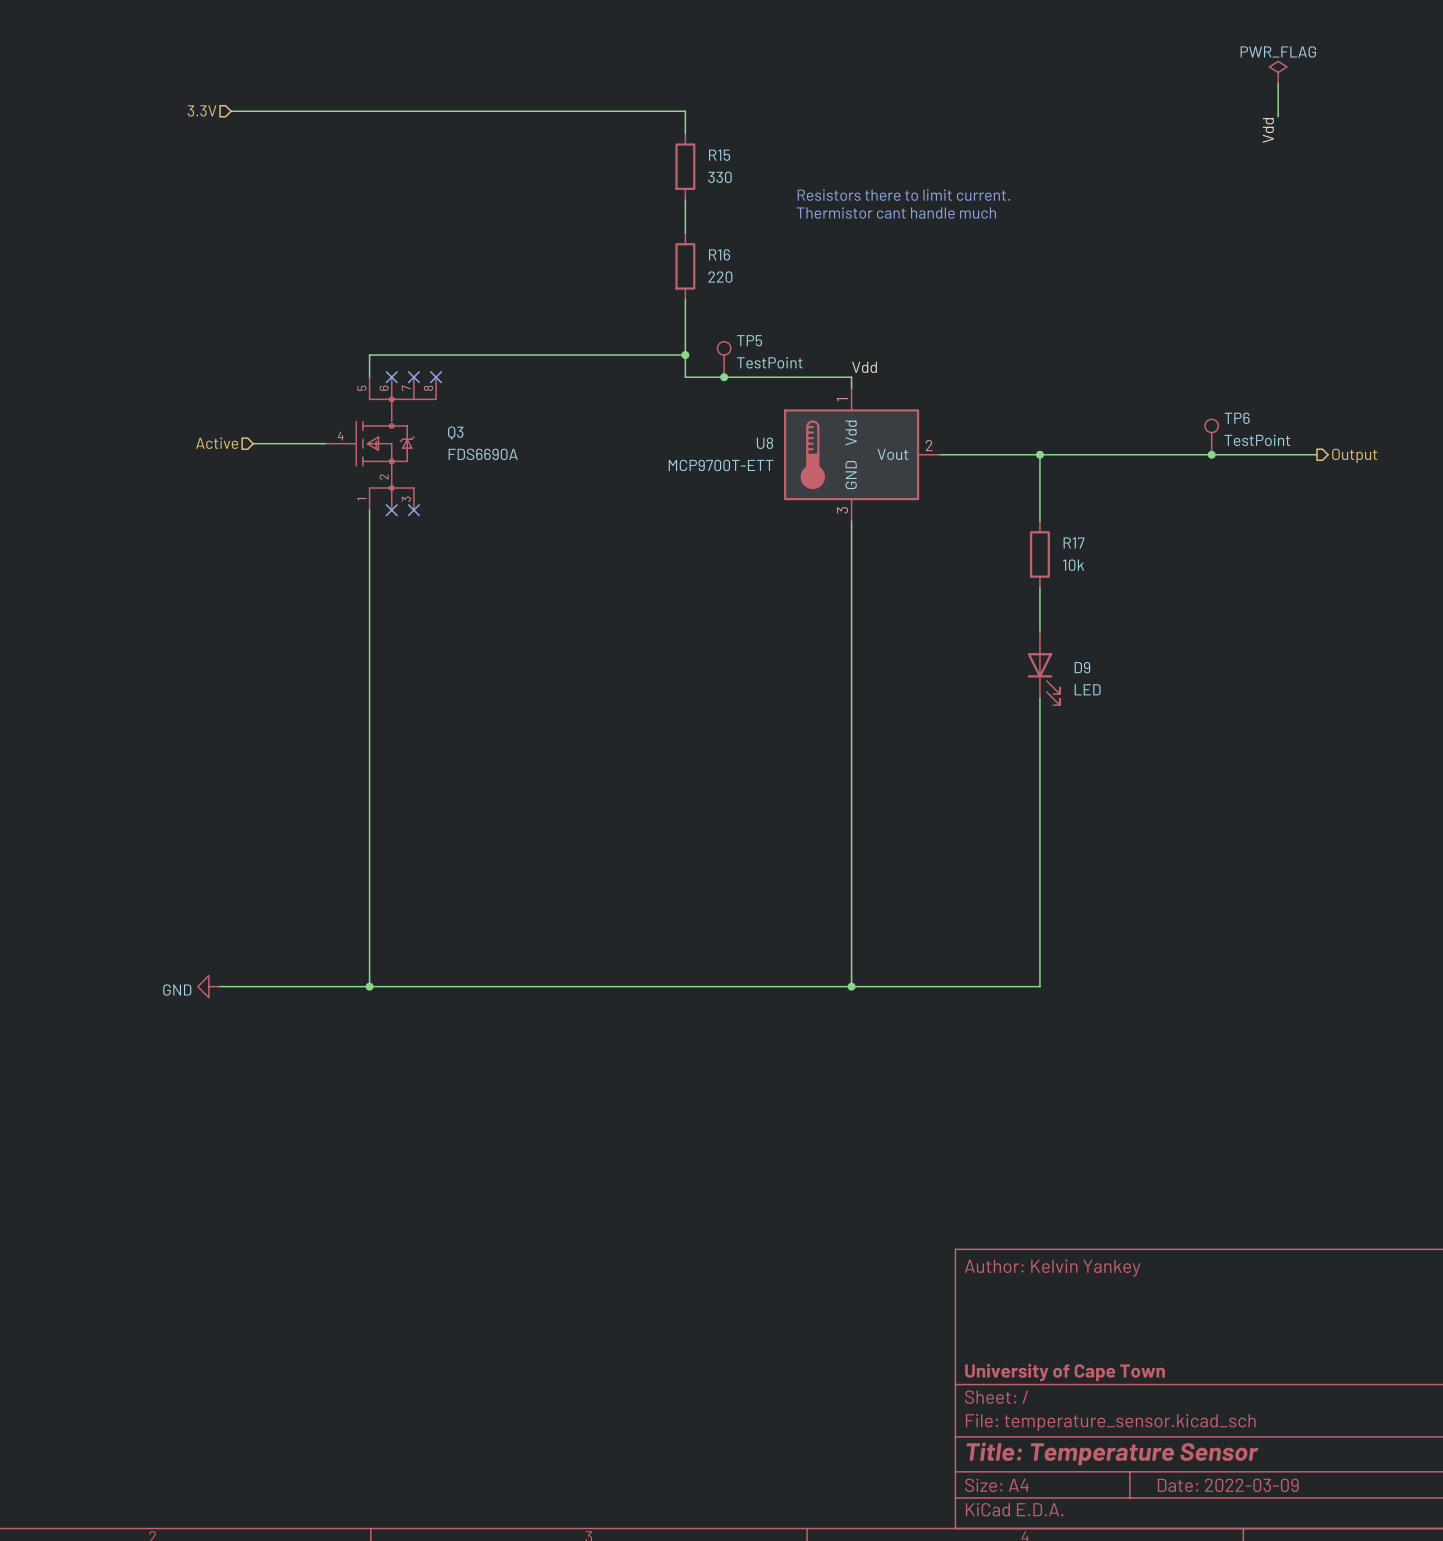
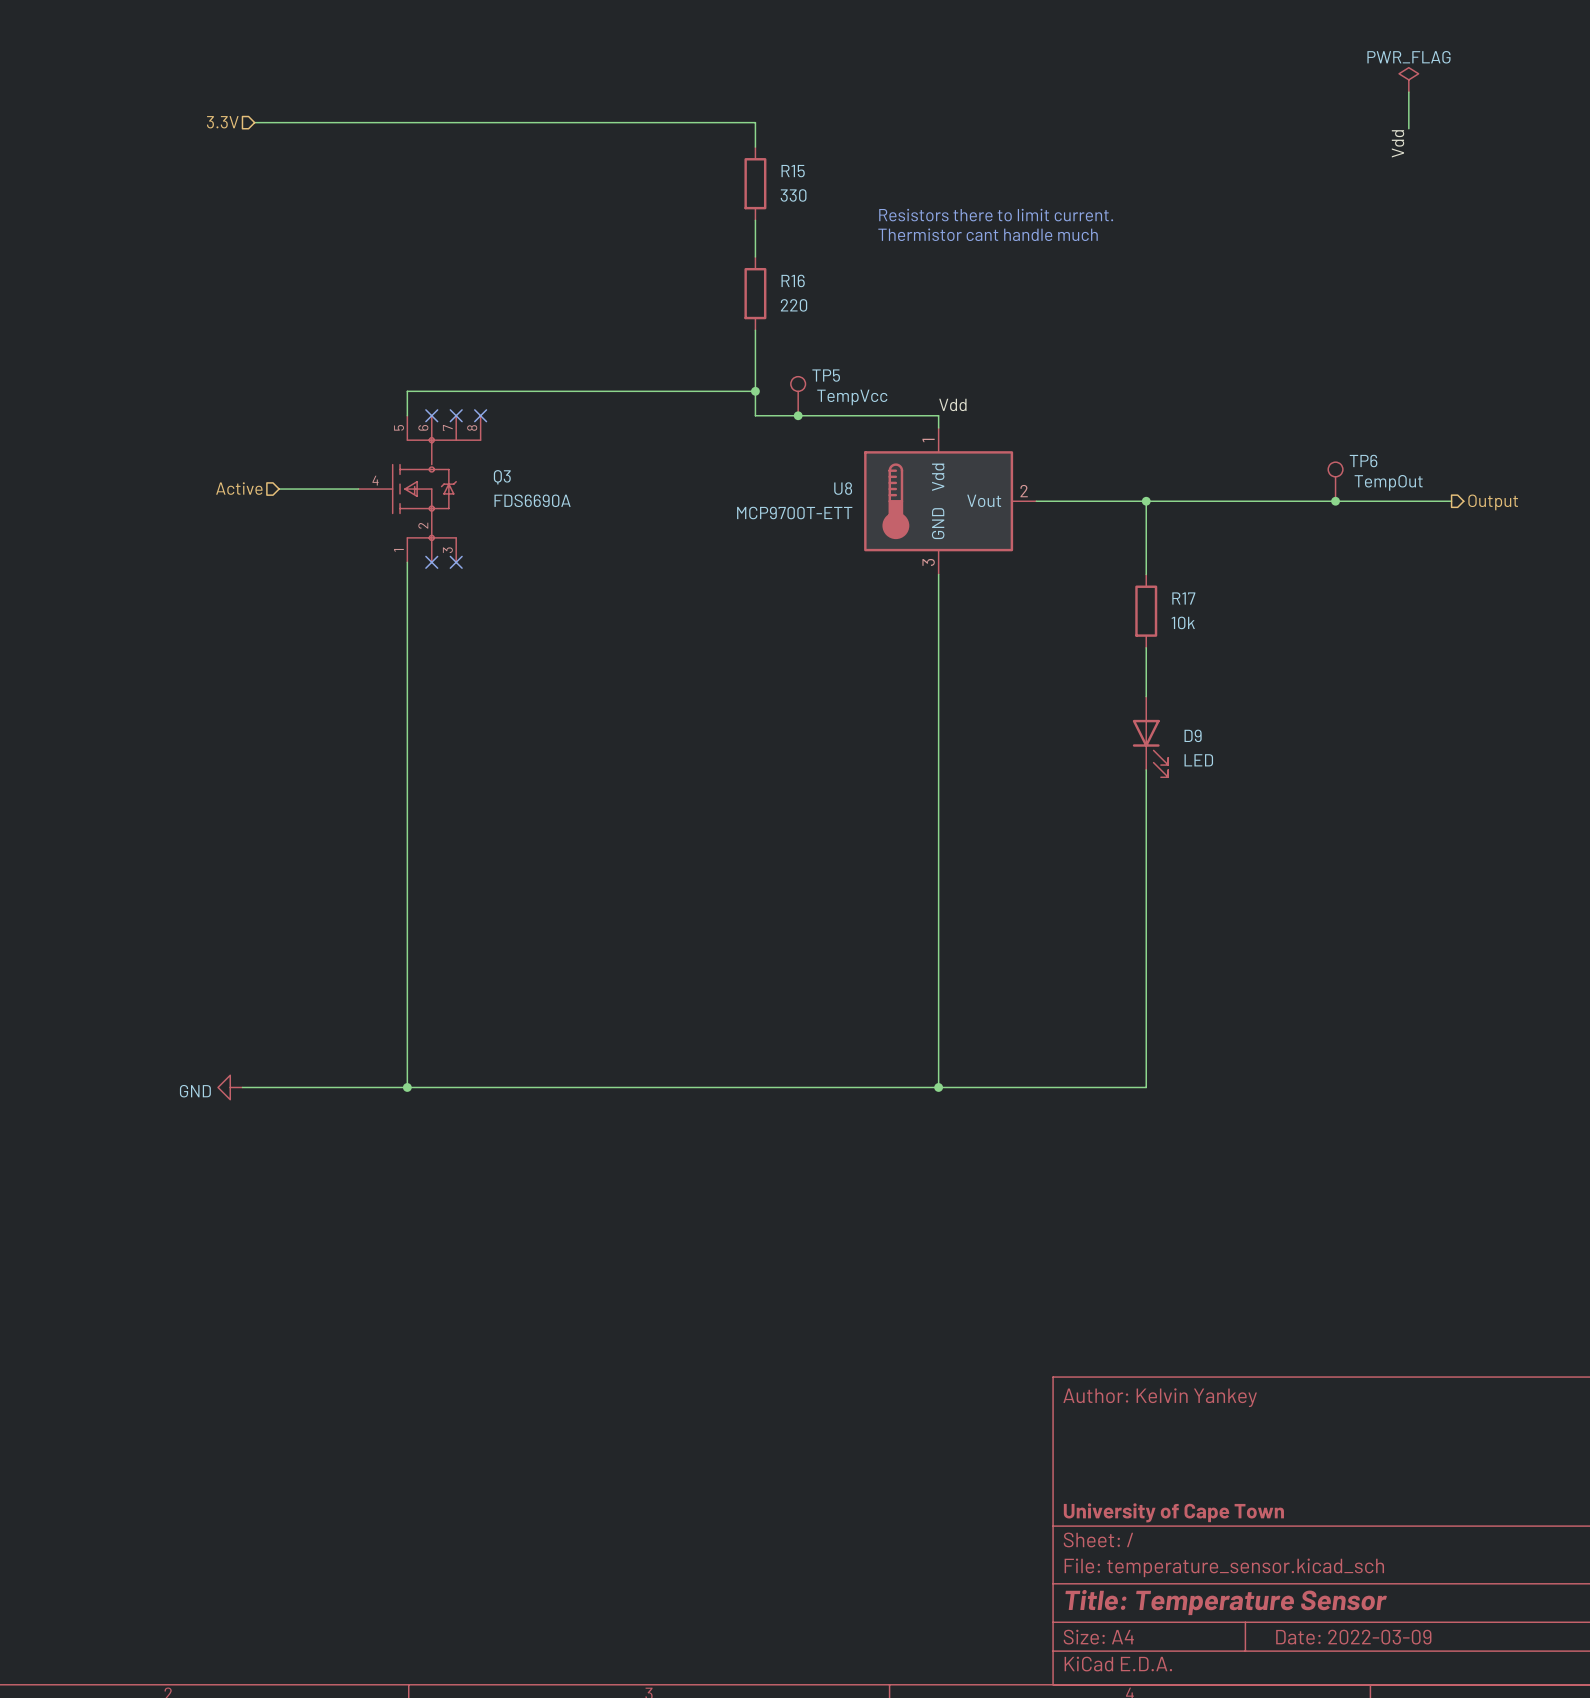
TP5 value: TestPoint (769, 362) -> TempVcc (852, 397)
TP6 value: TestPoint (1257, 440) -> TempOut (1388, 482)

